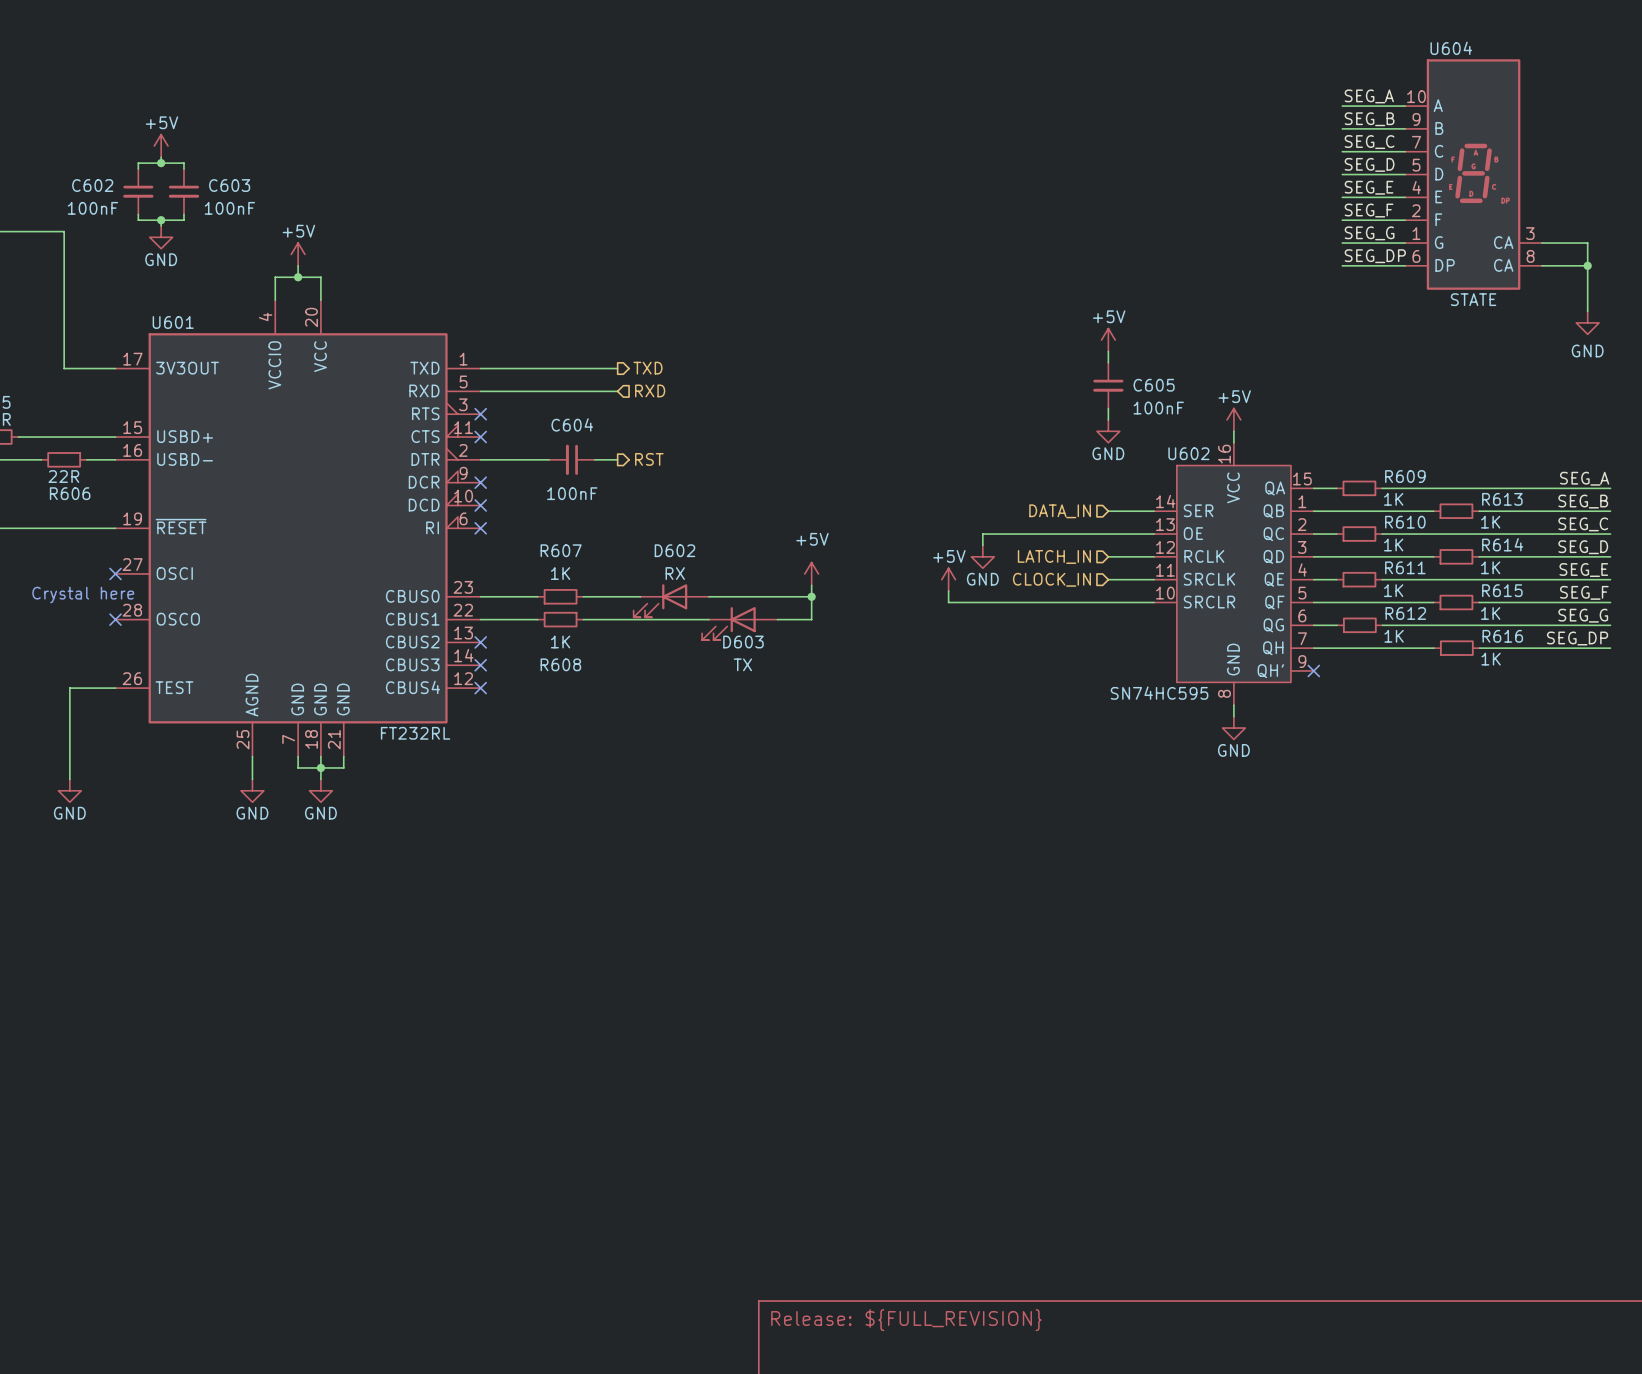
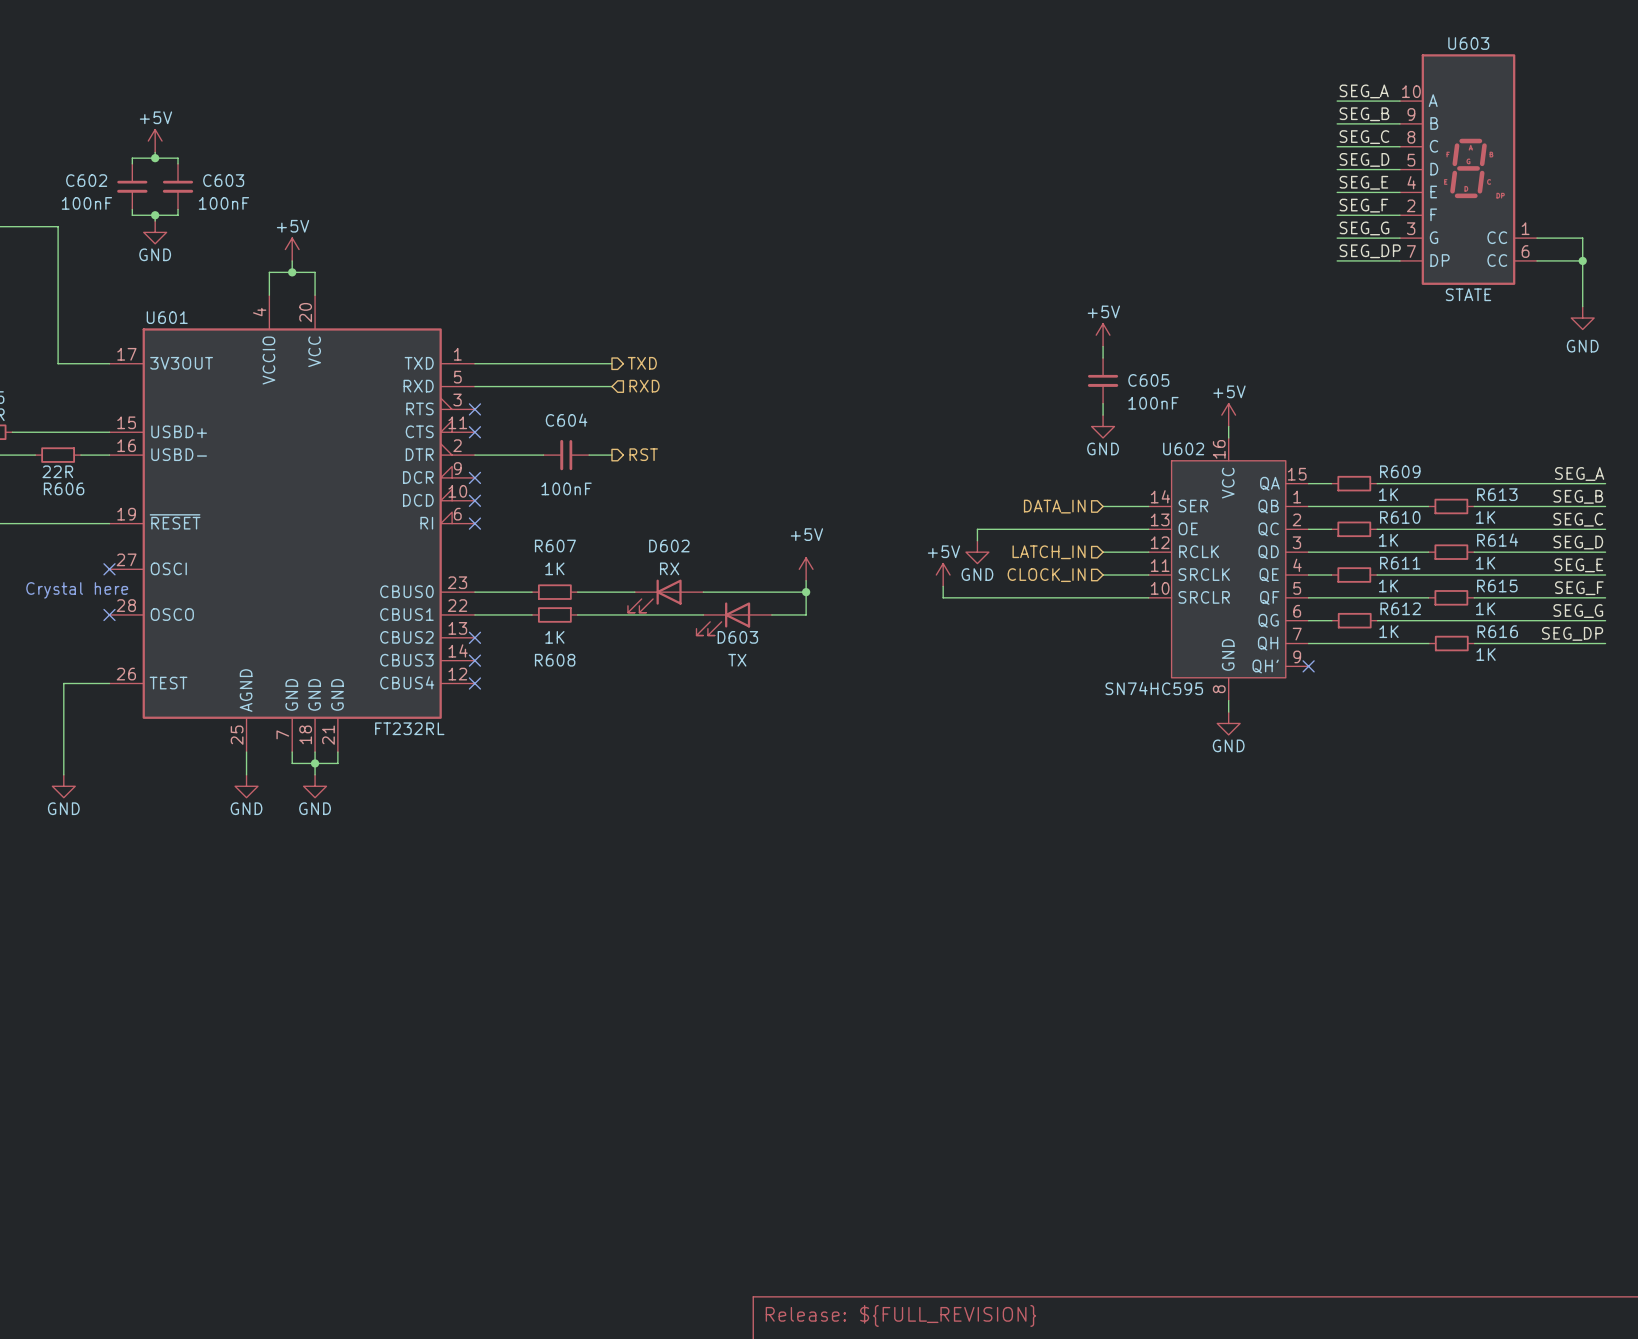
U604 name: U604 (1451, 48) -> U603 (1468, 43)
U604 pin number: 7 (1416, 142) -> 8 (1411, 137)
U604 pin number: 1 (1416, 233) -> 3 (1411, 228)
U604 pin number: 3 (1530, 233) -> 1 (1525, 228)
U604 pin name: CA (1503, 242) -> CC (1497, 237)
U604 pin number: 6 (1416, 256) -> 7 (1411, 251)
U604 pin number: 8 (1530, 256) -> 6 (1525, 251)
U604 pin name: CA (1503, 265) -> CC (1497, 260)

